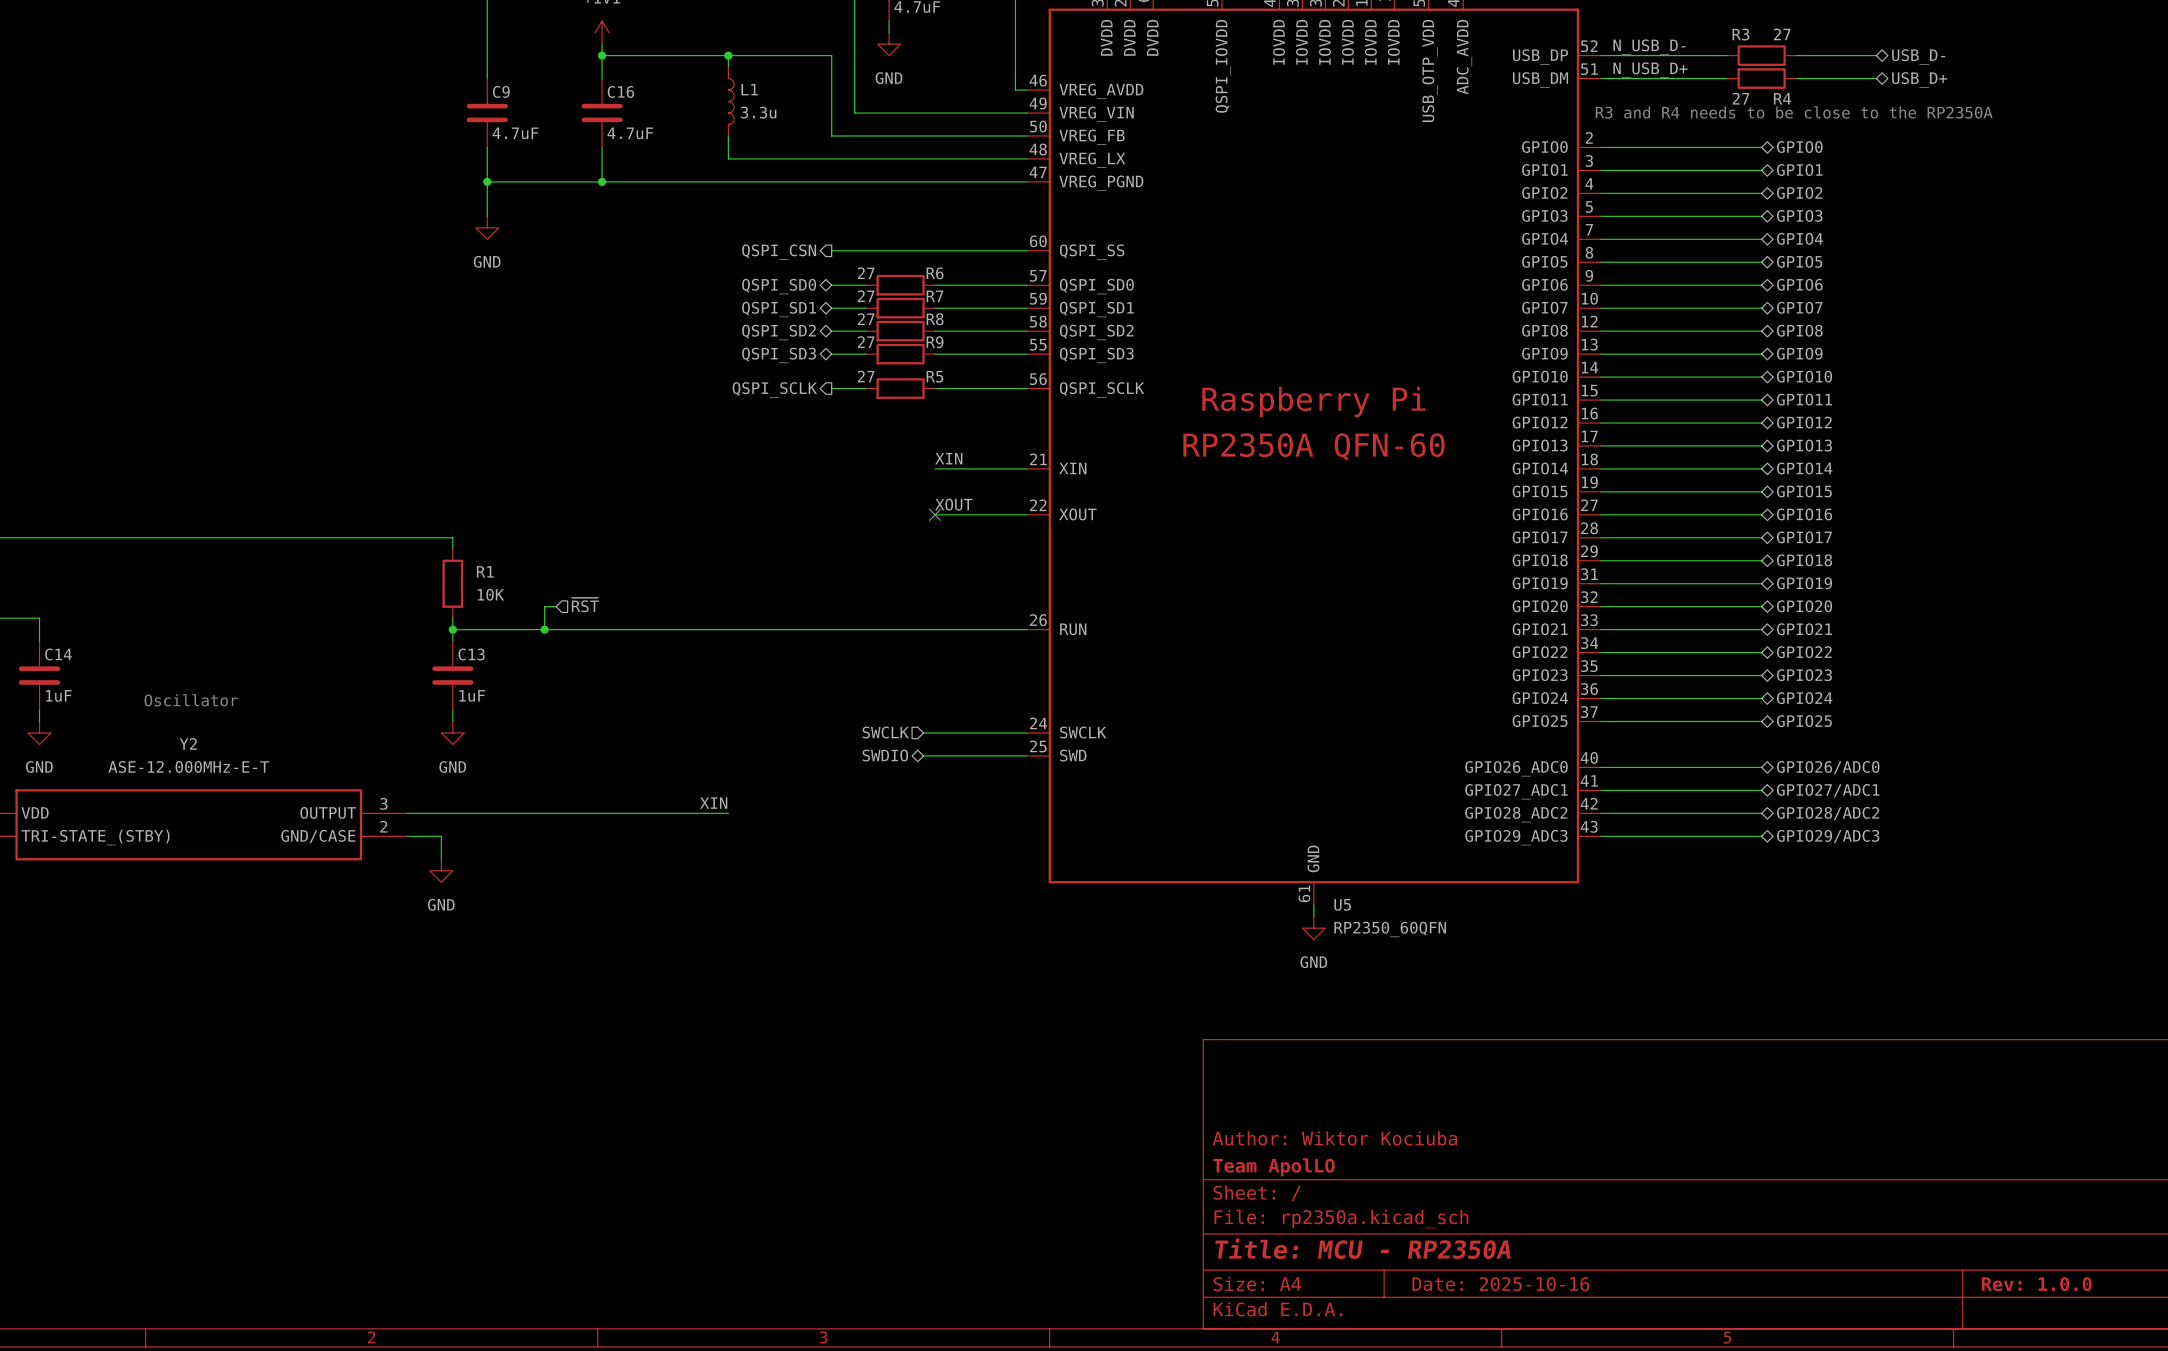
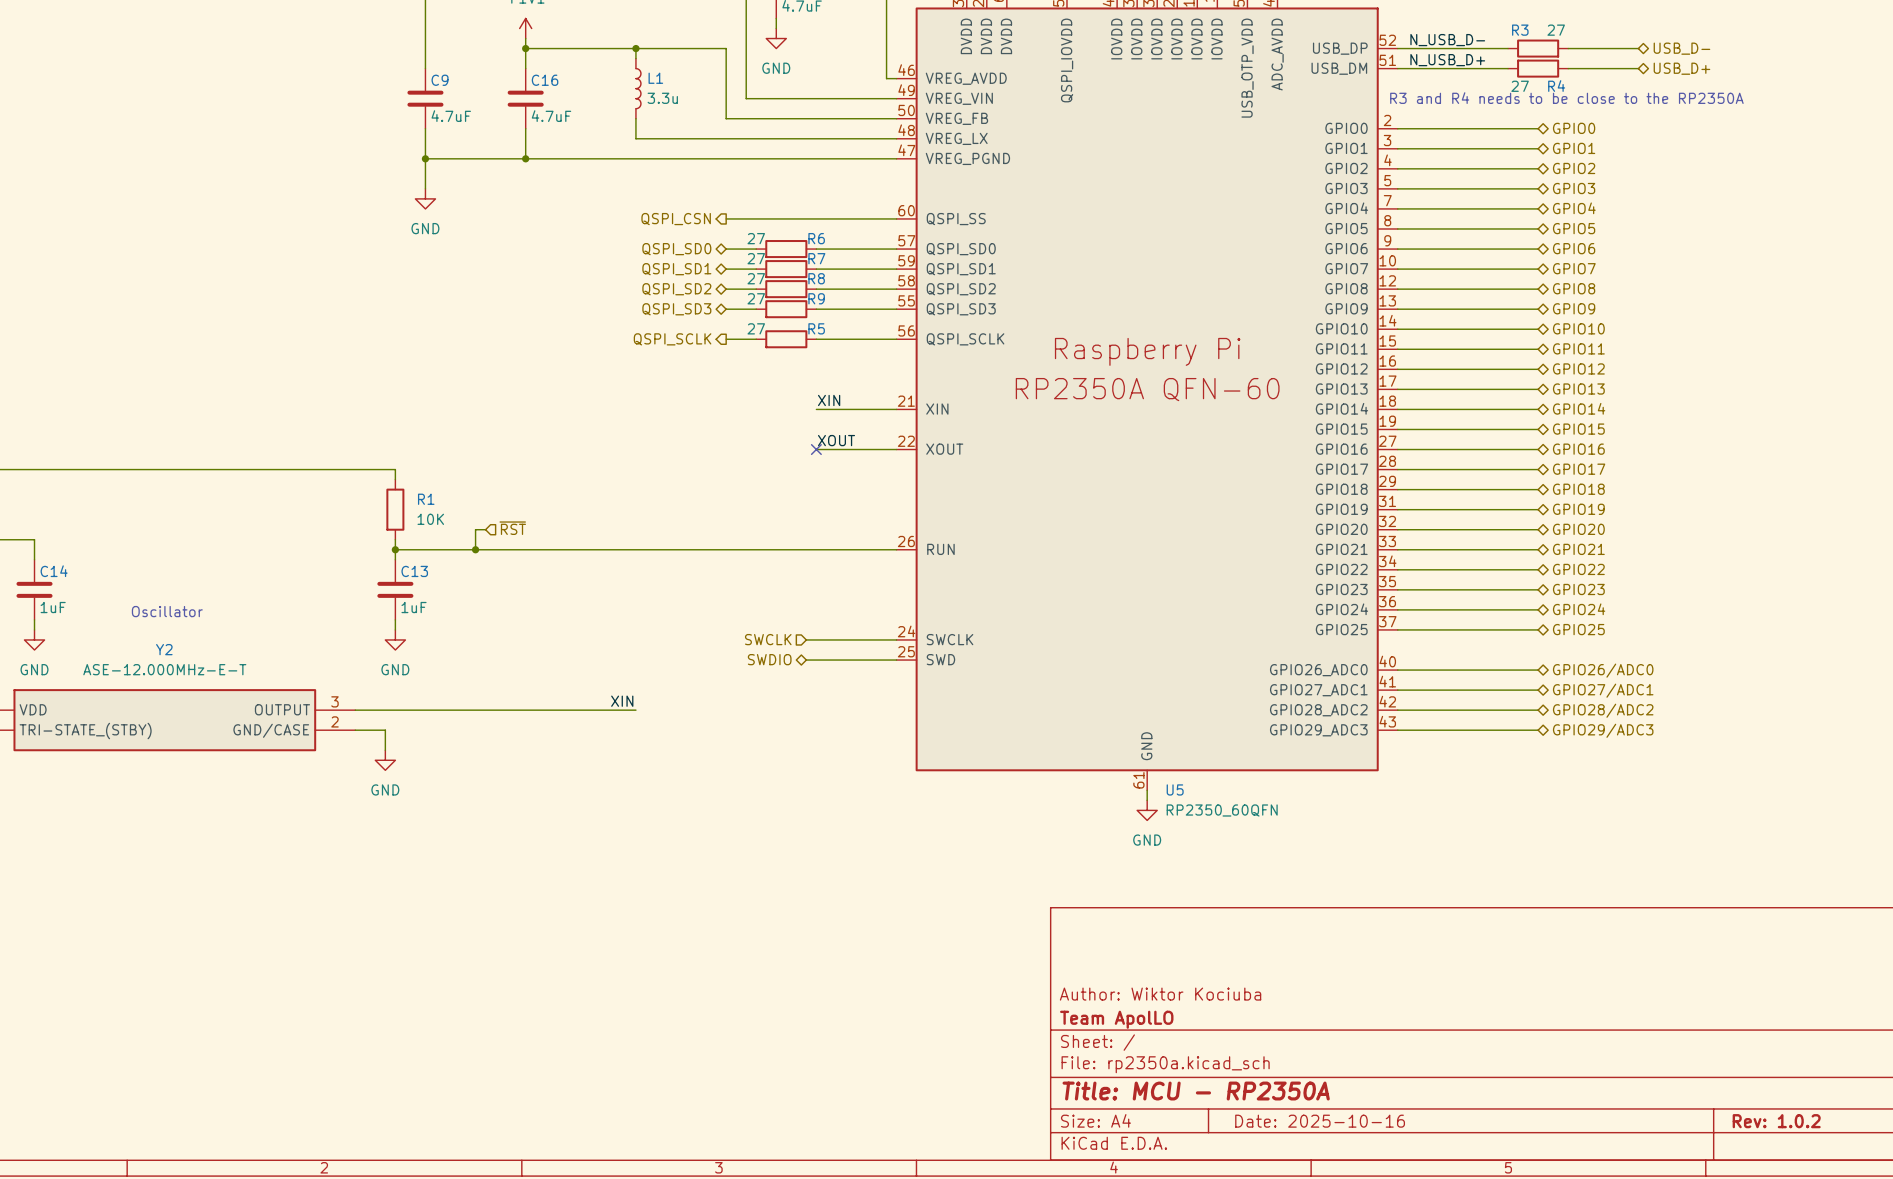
title block: Rev: 1.0.0 (2036, 1284) -> Rev: 1.0.2 (1776, 1121)

